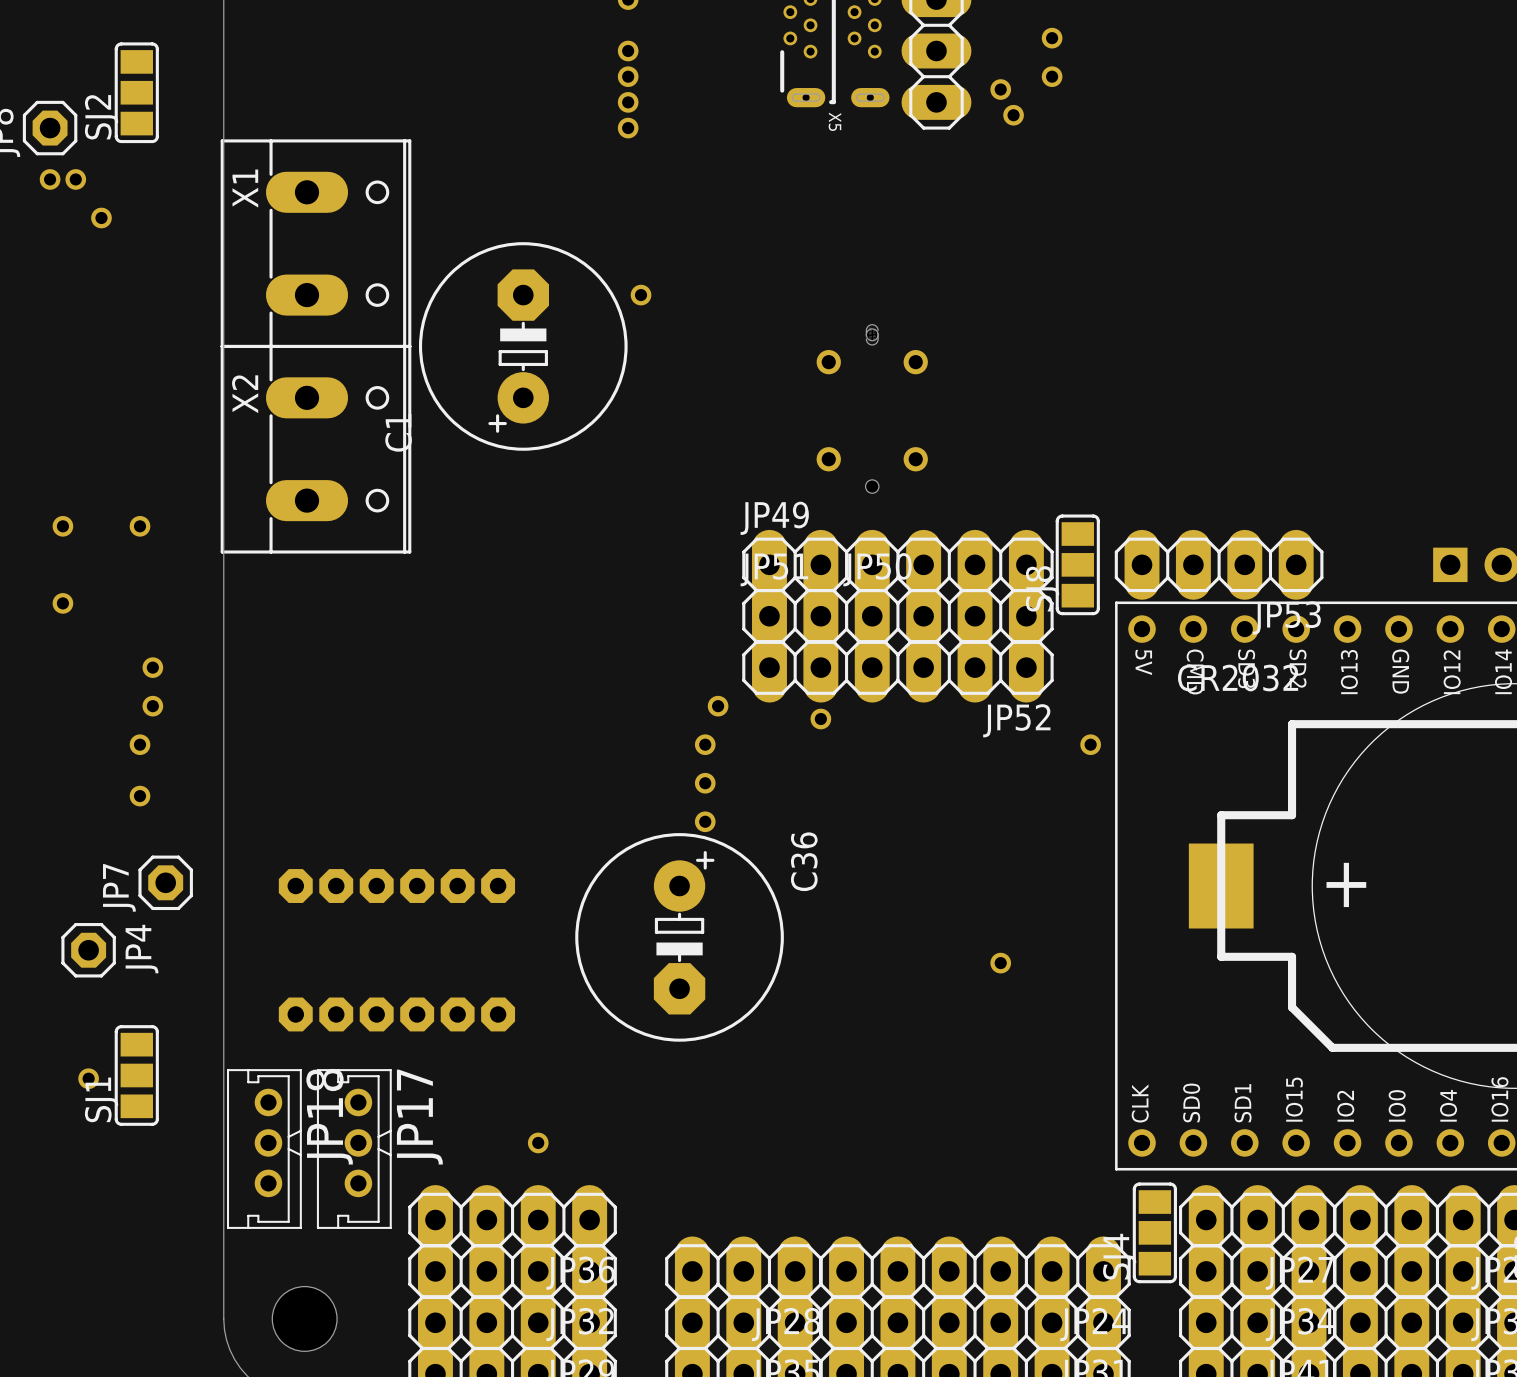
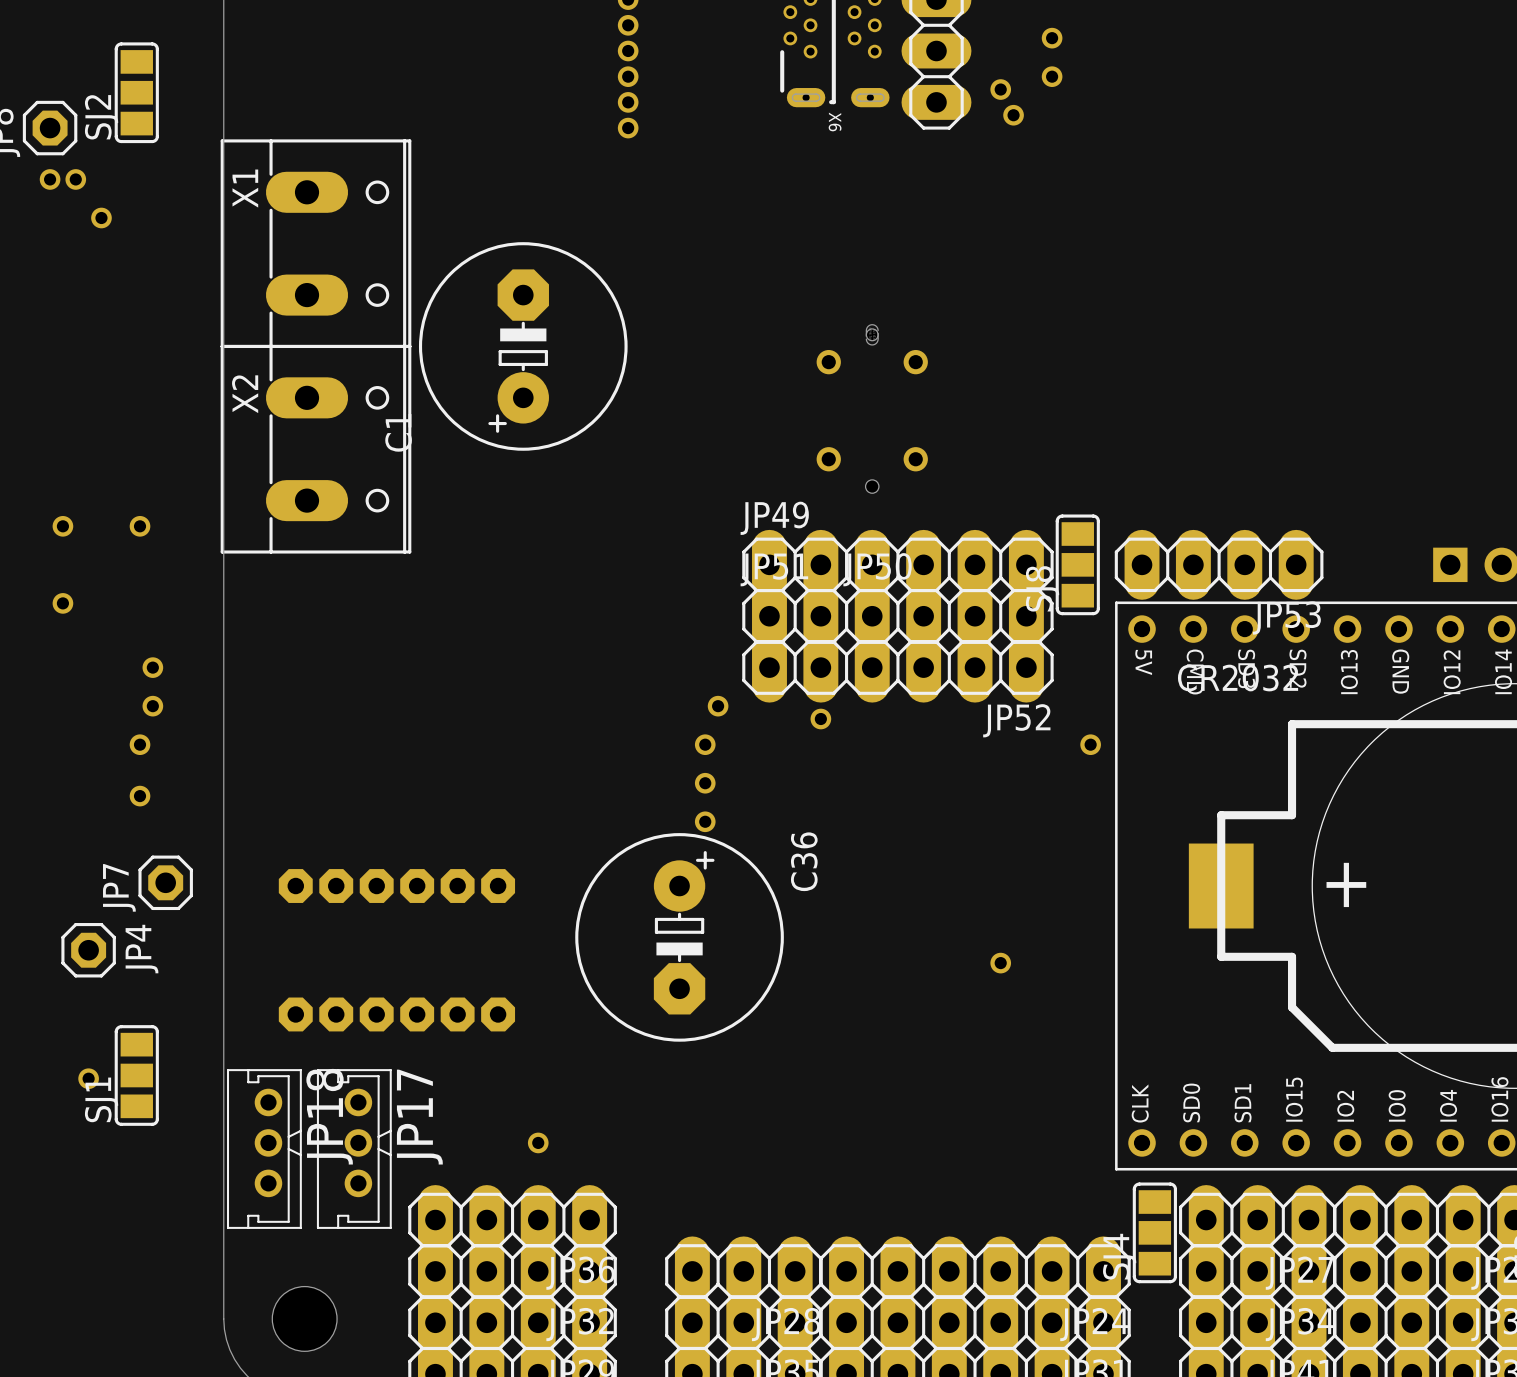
X5 name: X5 (834, 121) -> X6 (835, 121)
part position: (641, 295) -> (628, 25)

